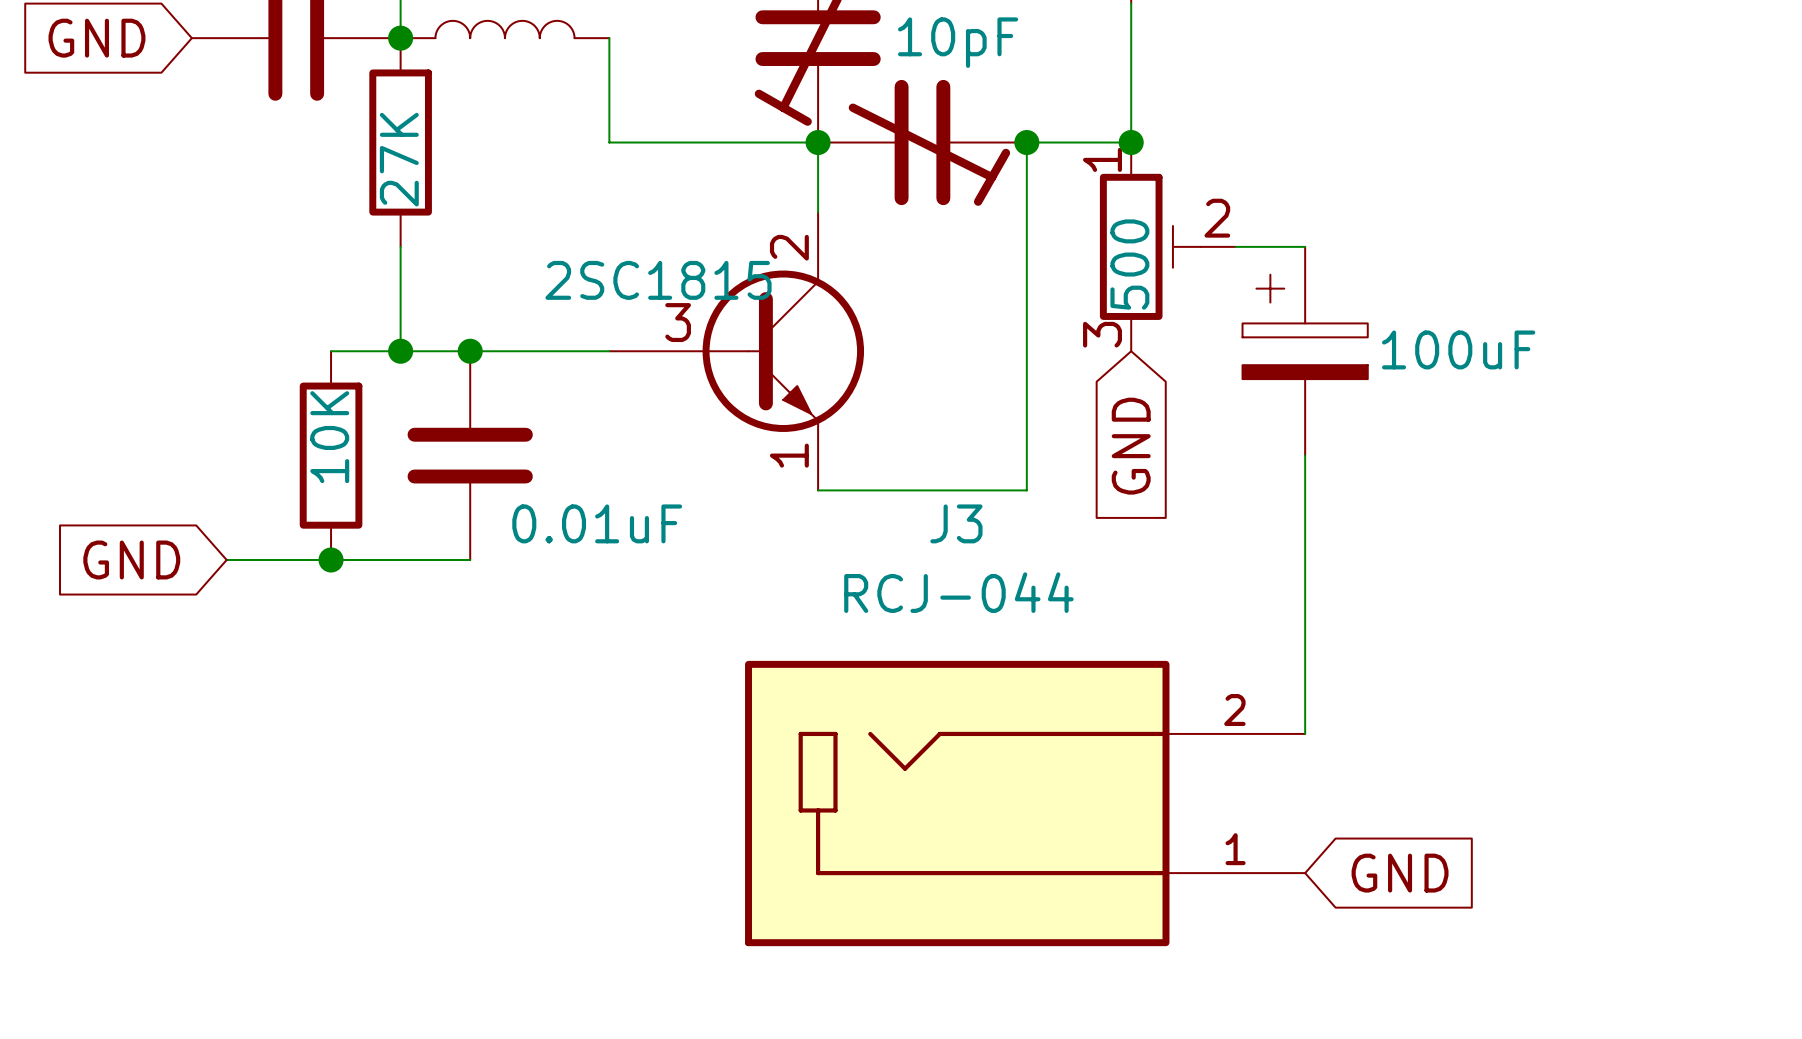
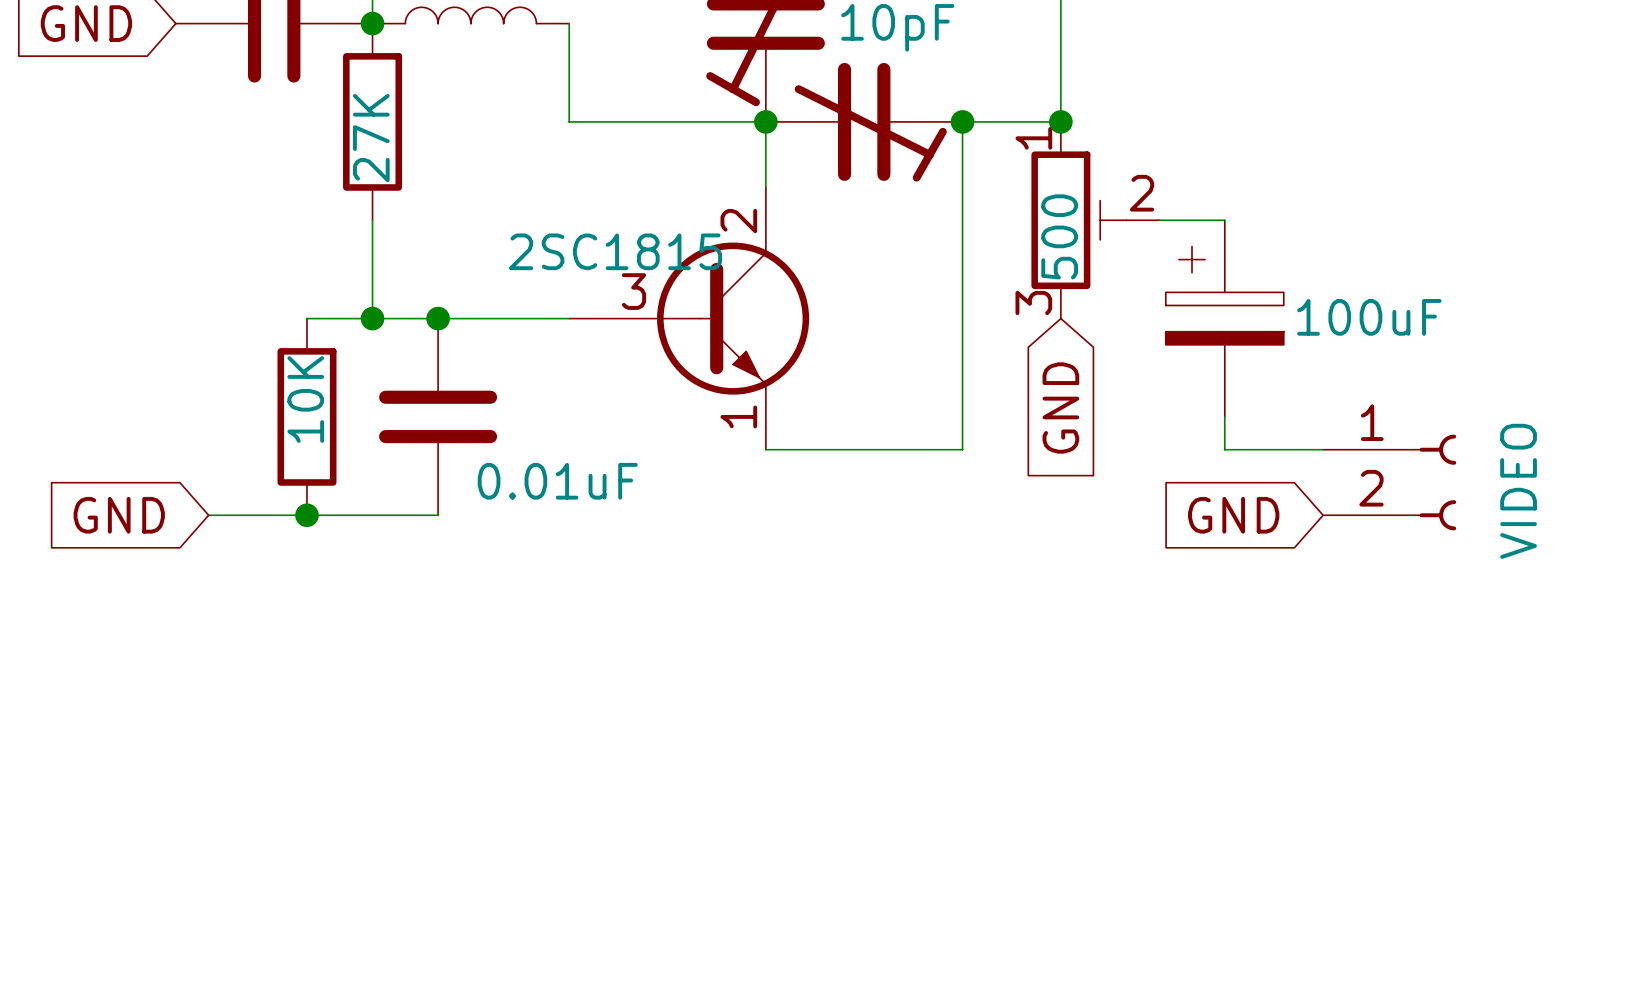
wire: (1305, 490) (1305, 733) -> (1224, 449) (1323, 449)
part: none -> VIDEO (1389, 482)
J3: RCJ-044 (1025, 803) -> none
global label rotation: 0° (1400, 873) -> 180° (1233, 515)
global label position: GND (1400, 873) -> GND (1233, 515)

